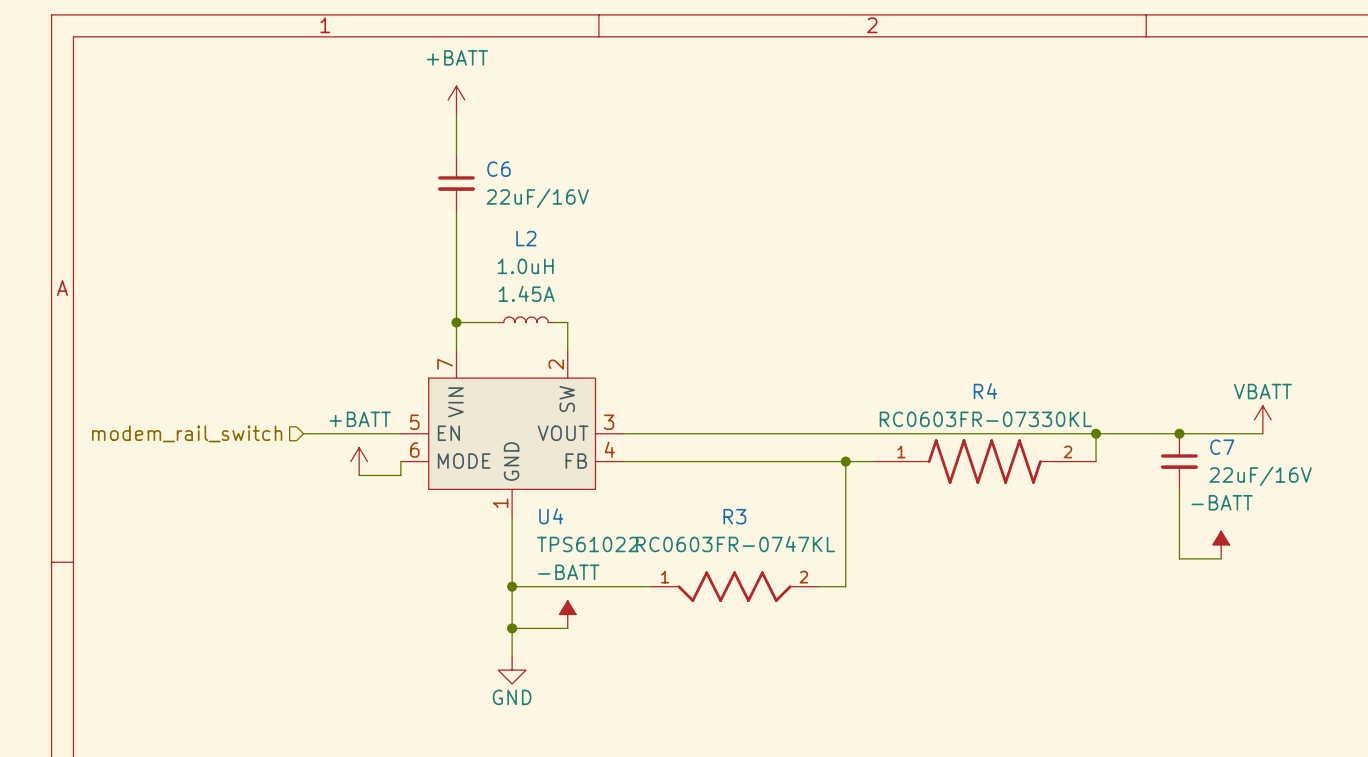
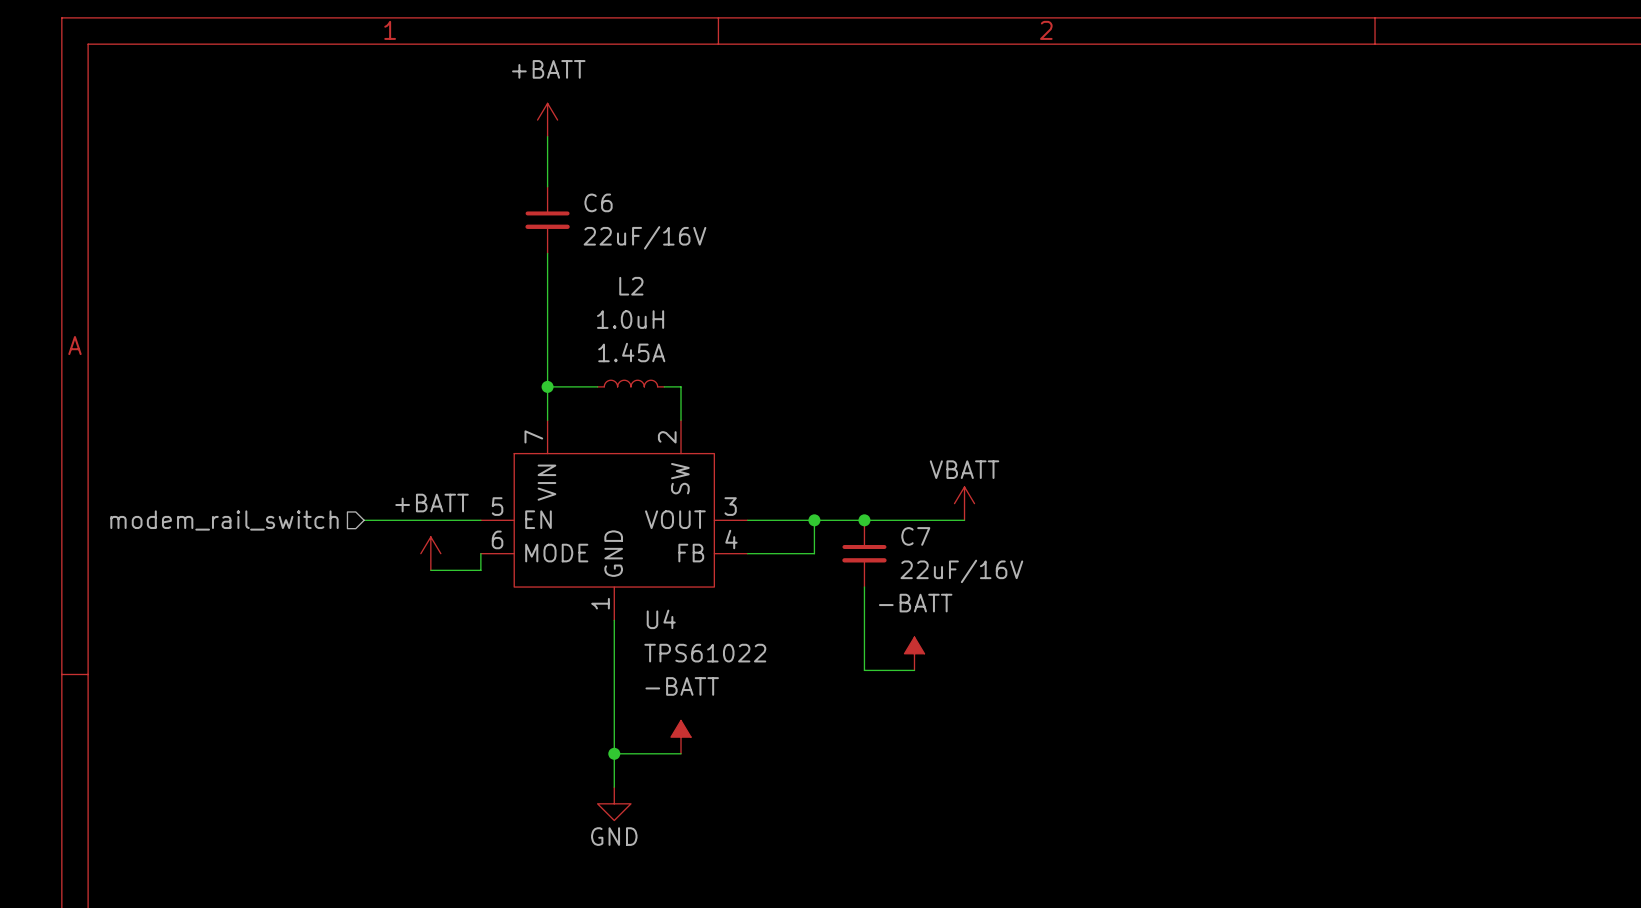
power symbol: none -> VBATT (964, 503)
power symbol: VBATT (1262, 419) -> none
junction: none -> (814, 520)
junction: none -> (864, 520)
wire: (804, 433) (1262, 433) -> none
wire: (1096, 433) (1096, 461) -> none
junction: (1096, 433) -> none
junction: (1179, 433) -> none
wire: (678, 461) (873, 461) -> (814, 553) (814, 520)
wire: (845, 461) (845, 586) (817, 586) -> none
junction: (845, 461) -> none
R4: RC0603FR-07330KL (984, 461) -> none
C7 position: (1179, 461) -> (864, 553)
wire: none -> (864, 587) (864, 670) (914, 670)
wire: (1179, 489) (1179, 558) (1221, 558) -> none
power symbol: none -> -BATT (914, 653)
power symbol: -BATT (1221, 544) -> none
wire: (512, 586) (651, 586) -> none
junction: (512, 586) -> none
R3: RC0603FR-0747KL (734, 586) -> none

